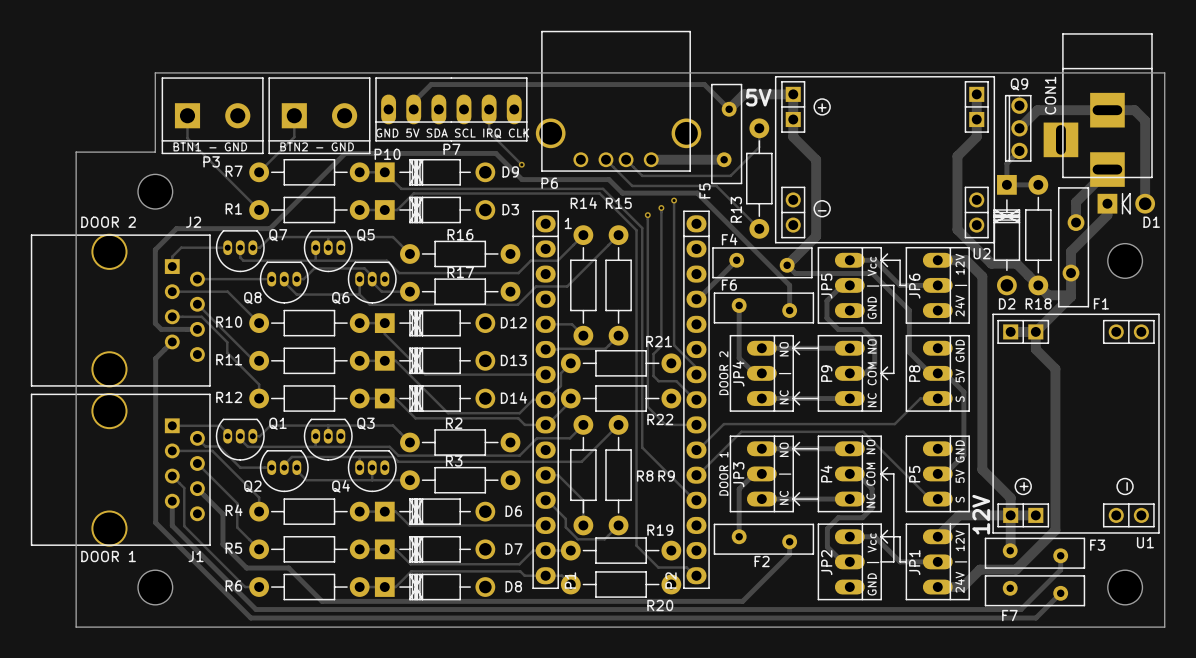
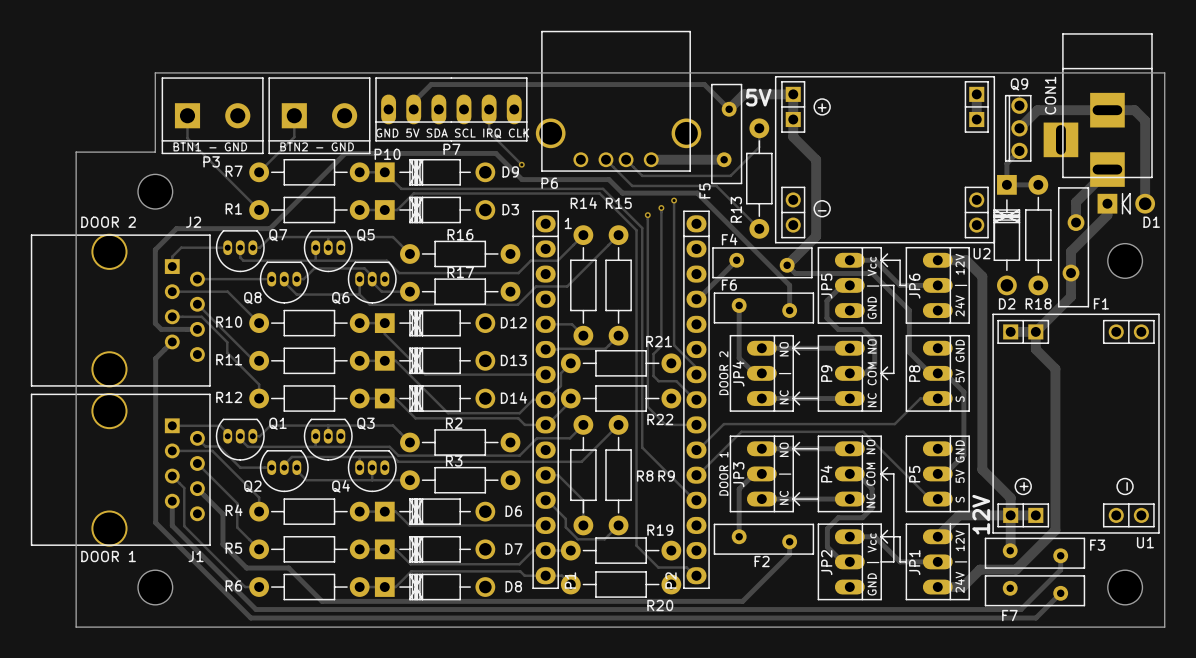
track: (976, 119) (976, 136) (957, 156) (957, 229) (991, 263) (1016, 263) (1048, 295) (1071, 296) -> none

